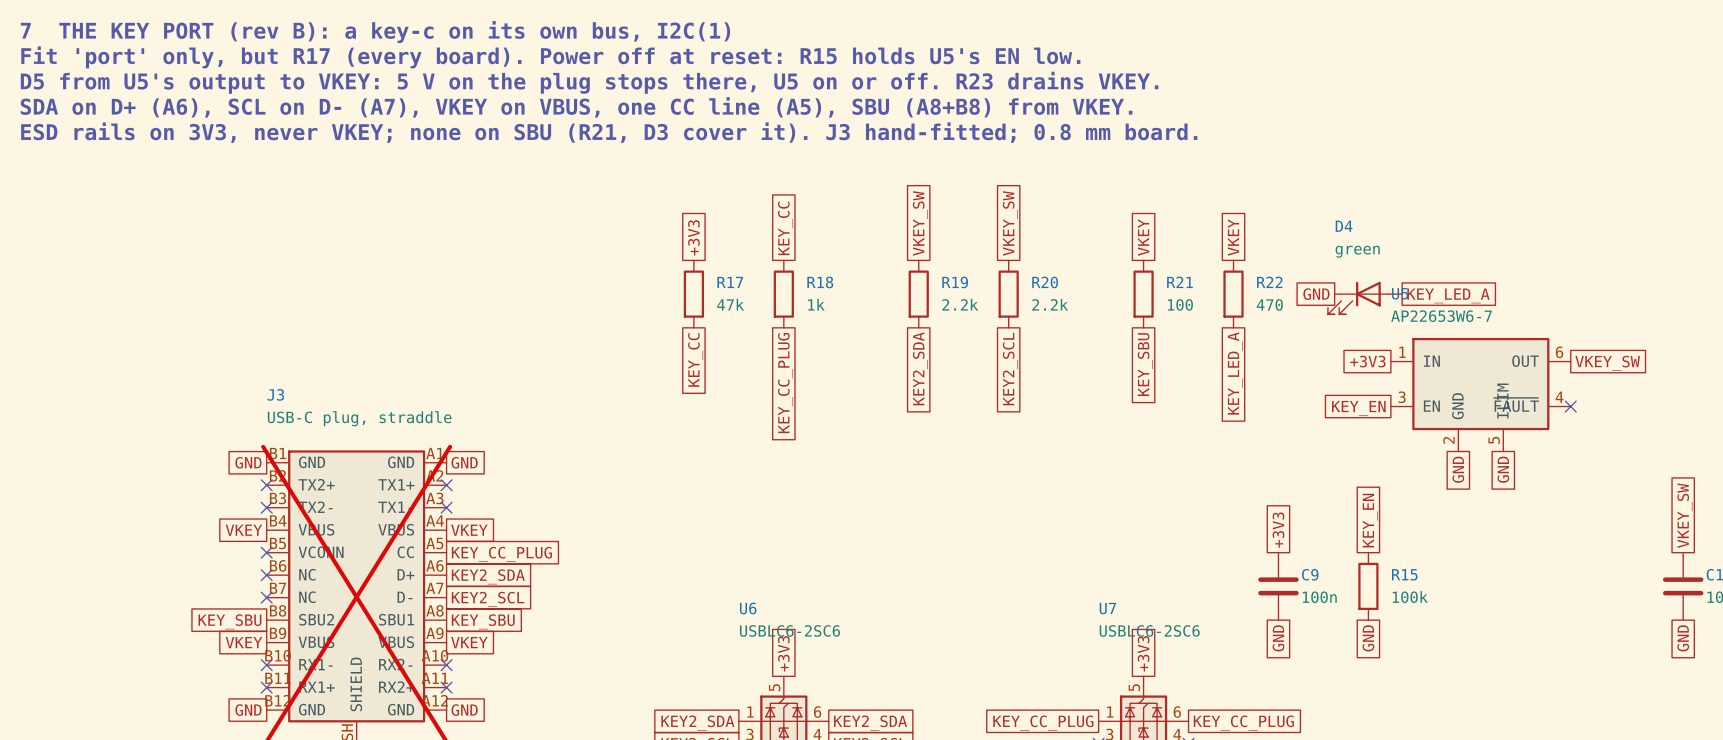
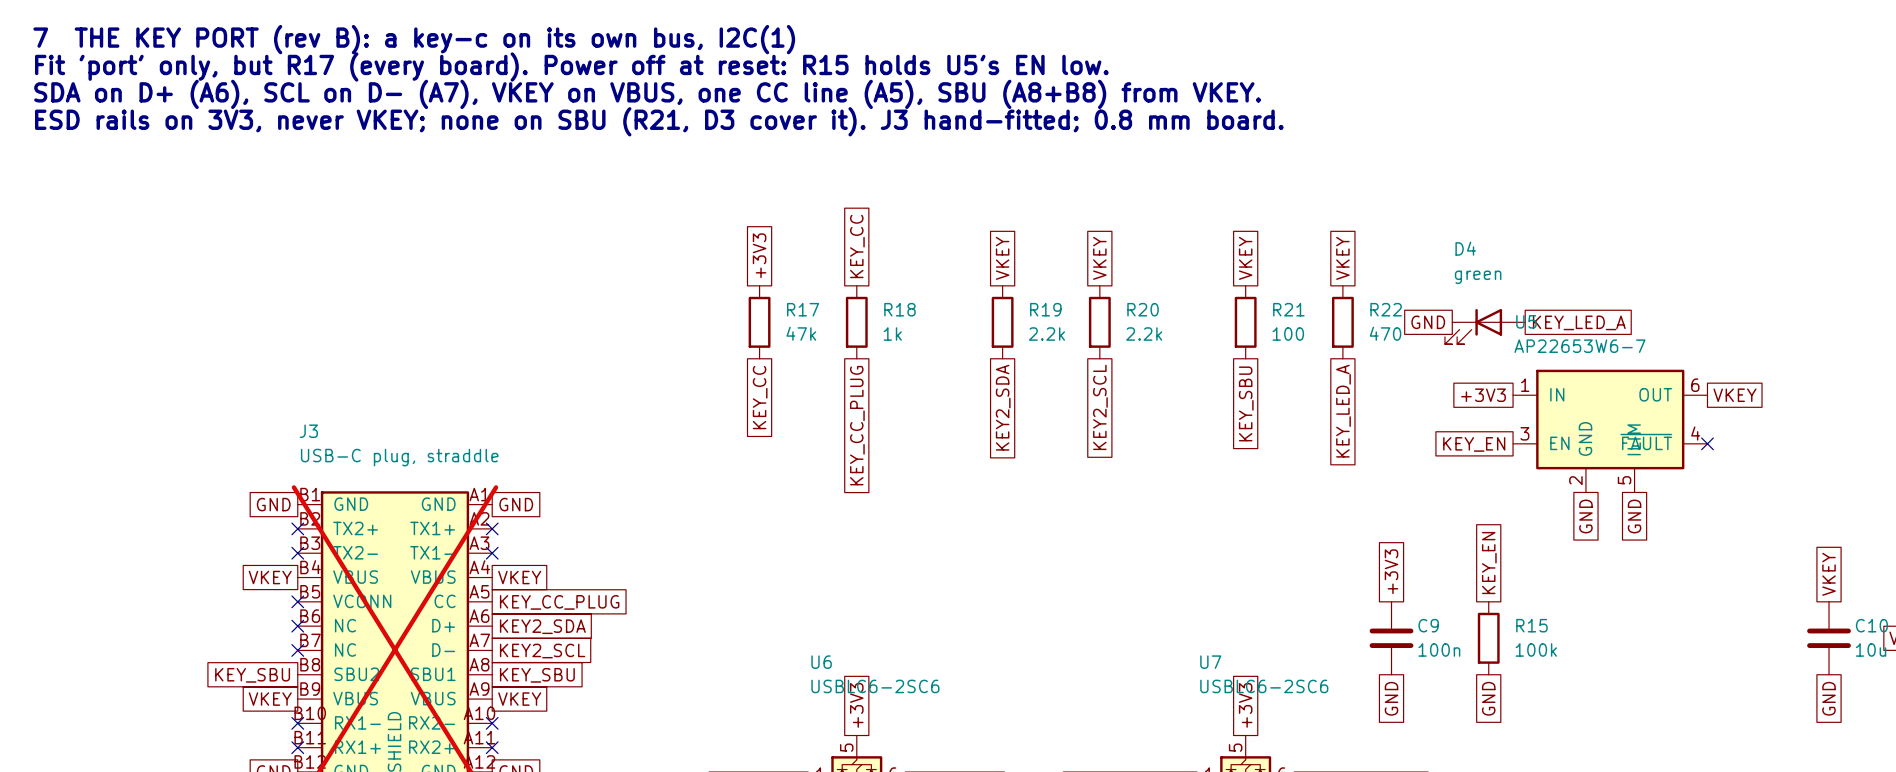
text: D5 from U5's output to VKEY: 5 V on the plug stops there, U5 on or off. R23 drains VKEY. (589, 82) -> SDA on D+ (A6), SCL on D- (A7), VKEY on VBUS, one CC line (A5), SBU (A8+B8) from VKEY. (647, 94)
text: SDA on D+ (A6), SCL on D- (A7), VKEY on VBUS, one CC line (A5), SBU (A8+B8) from VKEY. (576, 107) -> ESD rails on 3V3, never VKEY; none on SBU (R21, D3 cover it). J3 hand-fitted; 0.8 mm board. (659, 121)
text: ESD rails on 3V3, never VKEY; none on SBU (R21, D3 cover it). J3 hand-fitted; 0.8 mm board. (609, 132) -> none
global label: VKEY_SW (920, 223) -> VKEY (1002, 258)
global label: VKEY_SW (1010, 223) -> VKEY (1099, 258)
global label: VKEY_SW (1607, 363) -> VKEY (1734, 395)
global label: VKEY_SW (1684, 515) -> VKEY (1829, 574)

